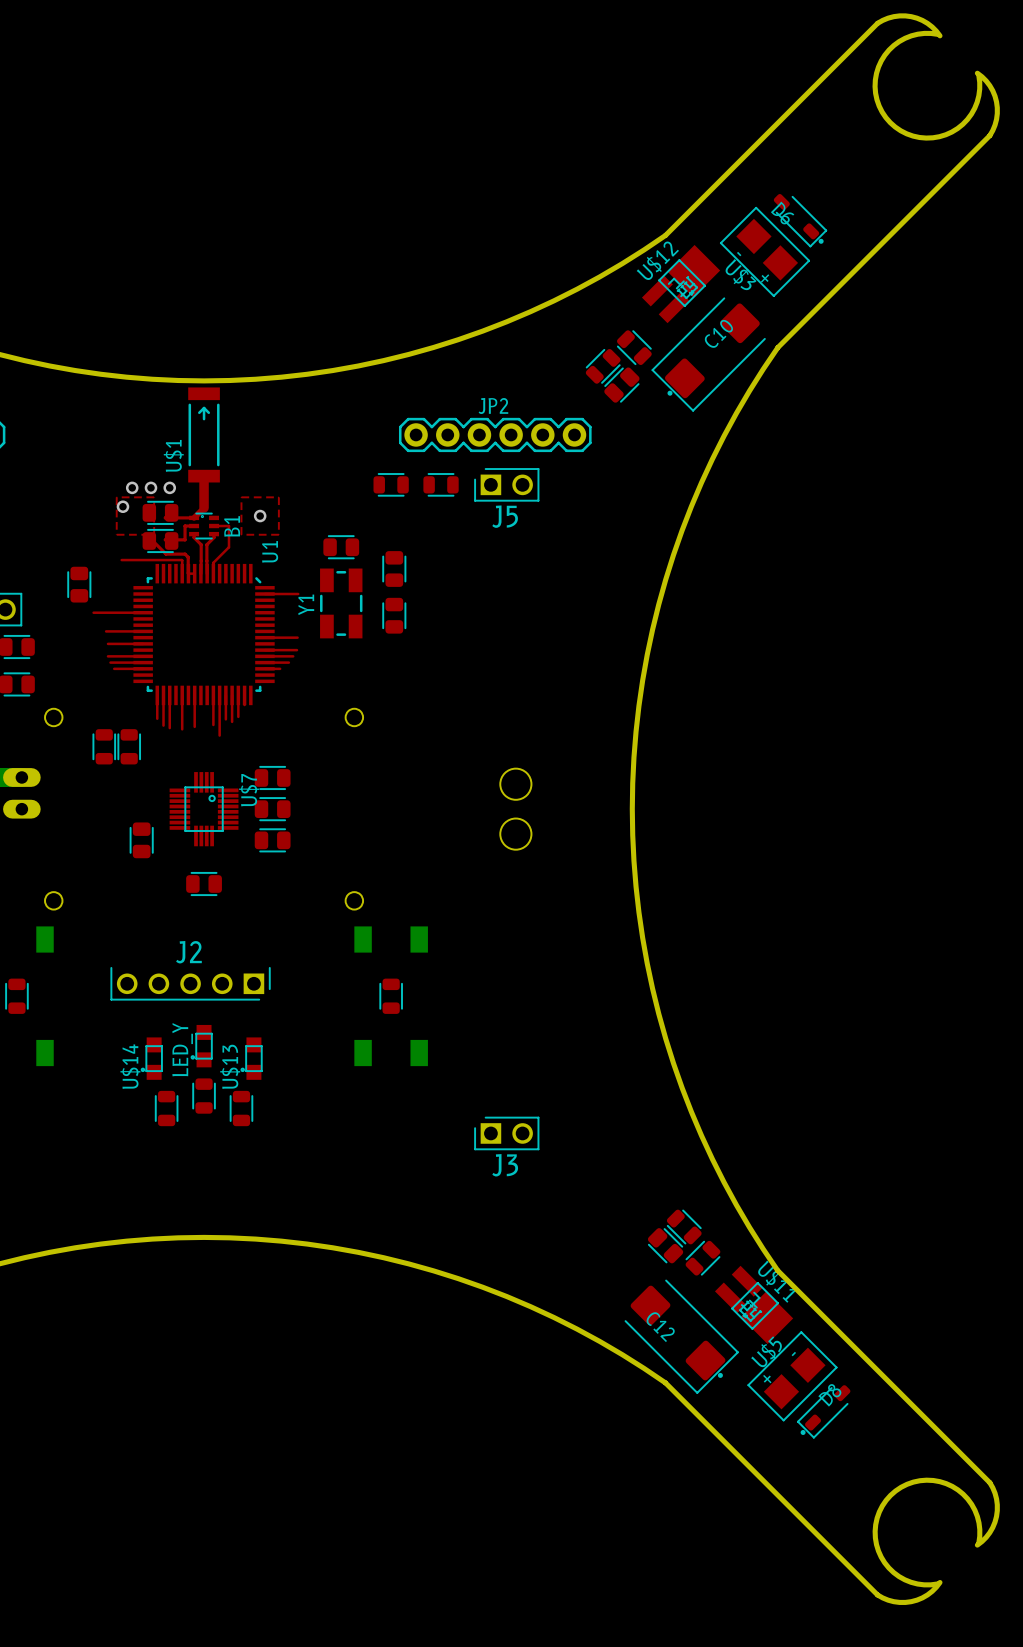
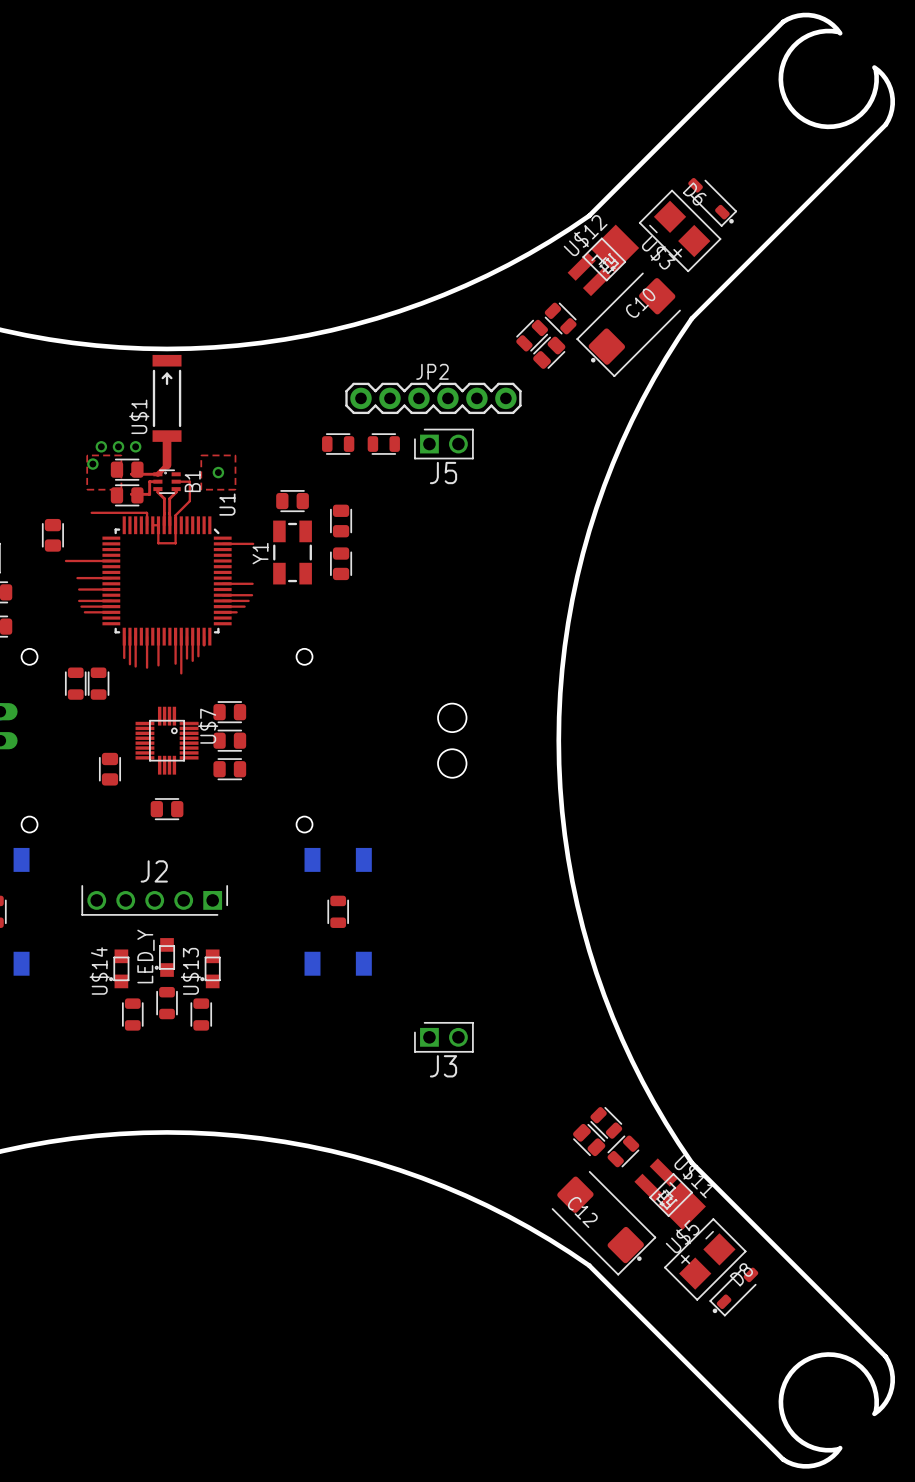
top track: (149, 540) (153, 541) (166, 554) (185, 554) (188, 557) (188, 573) -> none
top track: none -> (158, 525) (158, 543) (175, 543)
top track: none -> (175, 525) (175, 543)

